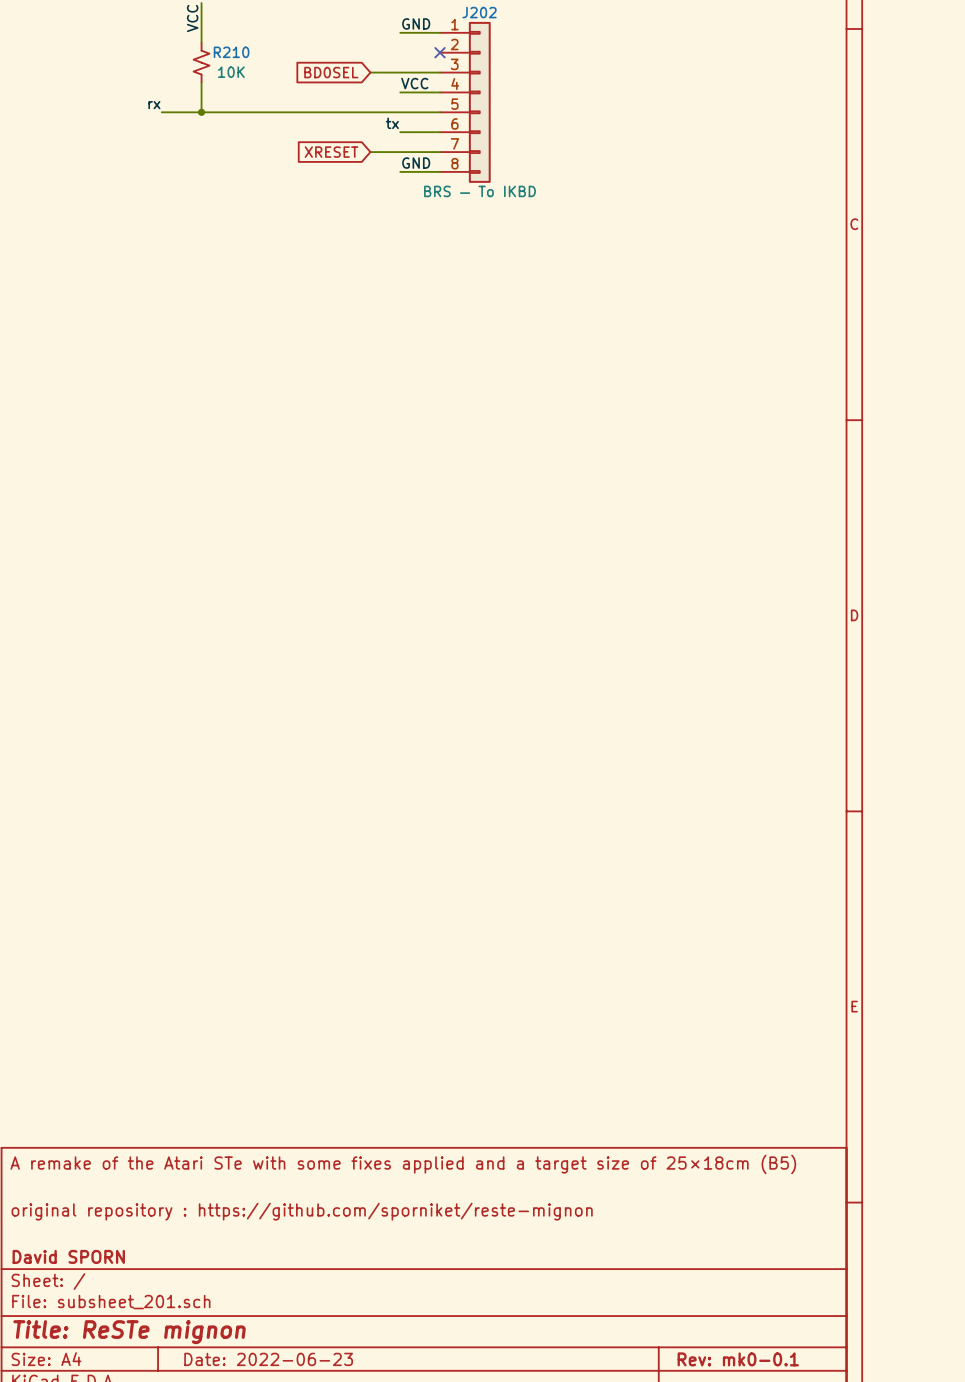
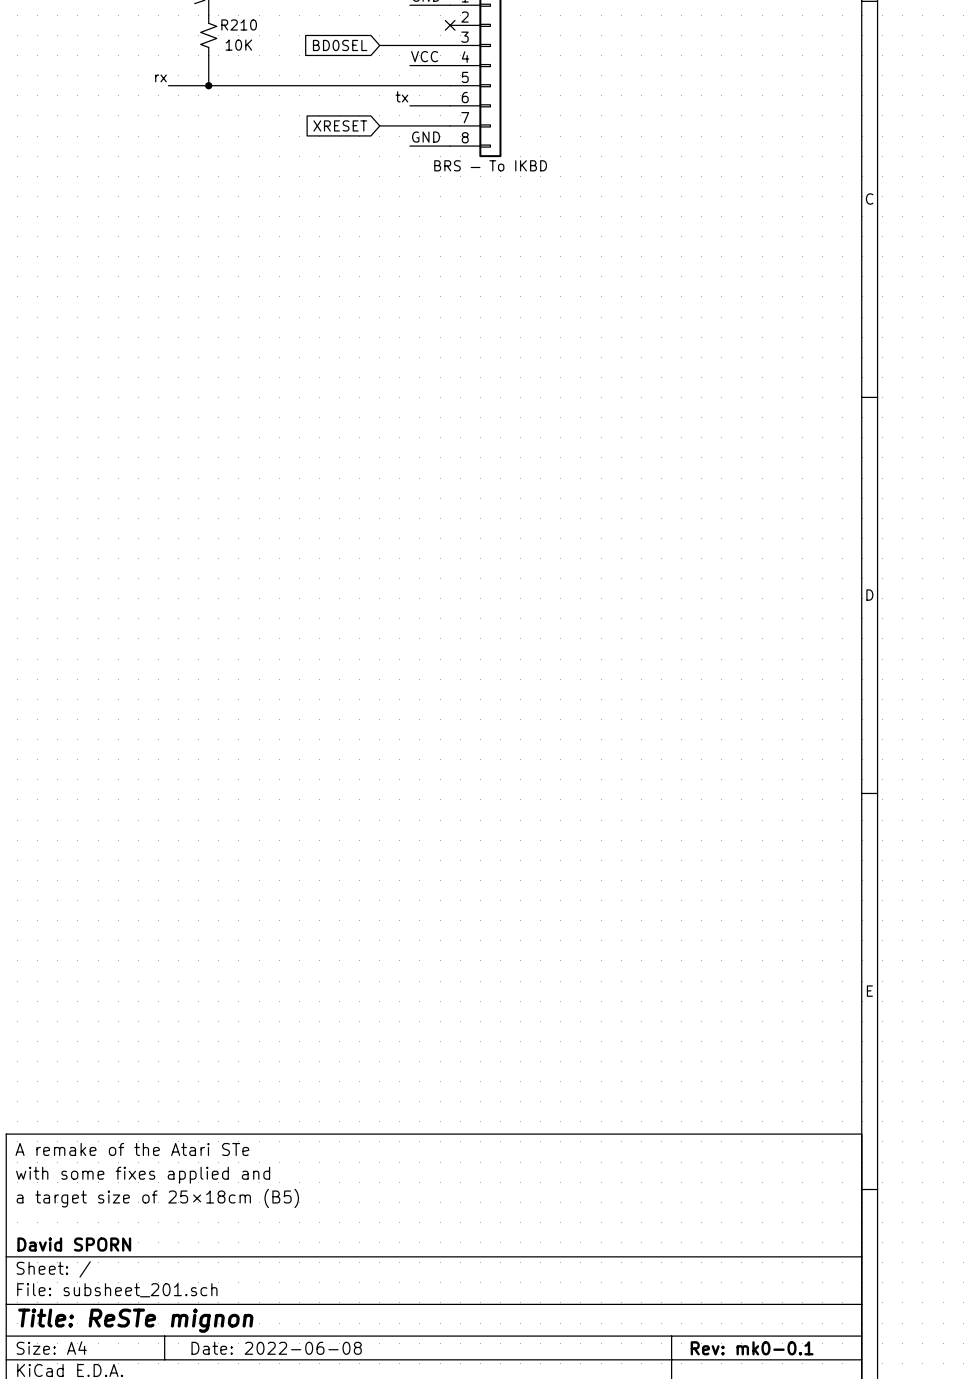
title block: A remake of the Atari STe with some fixes applied and a target size of 25×18cm (B5) (403, 1164) -> A remake of the Atari STe (132, 1149)
title block: none -> with some fixes applied and (143, 1175)
title block: original repository : https://github.com/sporniket/reste-mignon (302, 1211) -> a target size of 25×18cm (B5) (157, 1198)
title block: Date: 2022-06-23 (268, 1359) -> Date: 2022-06-08 (276, 1348)

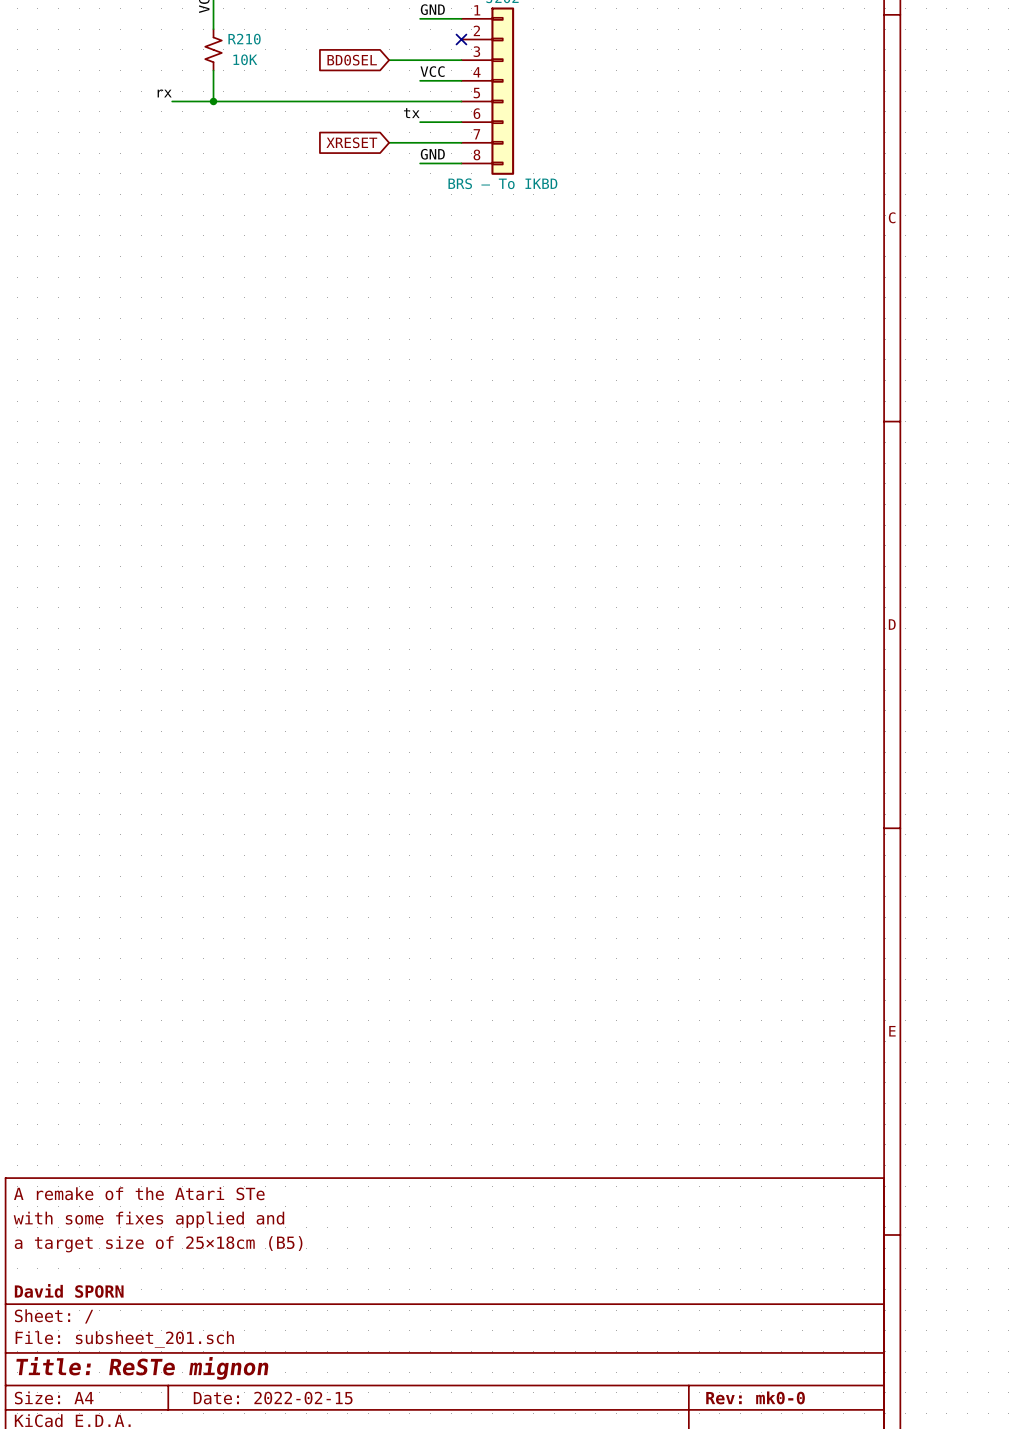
title block: Date: 2022-06-08 (276, 1348) -> Date: 2022-02-15 (273, 1398)
title block: Rev: mk0-0.1 (752, 1348) -> Rev: mk0-0 (755, 1397)

